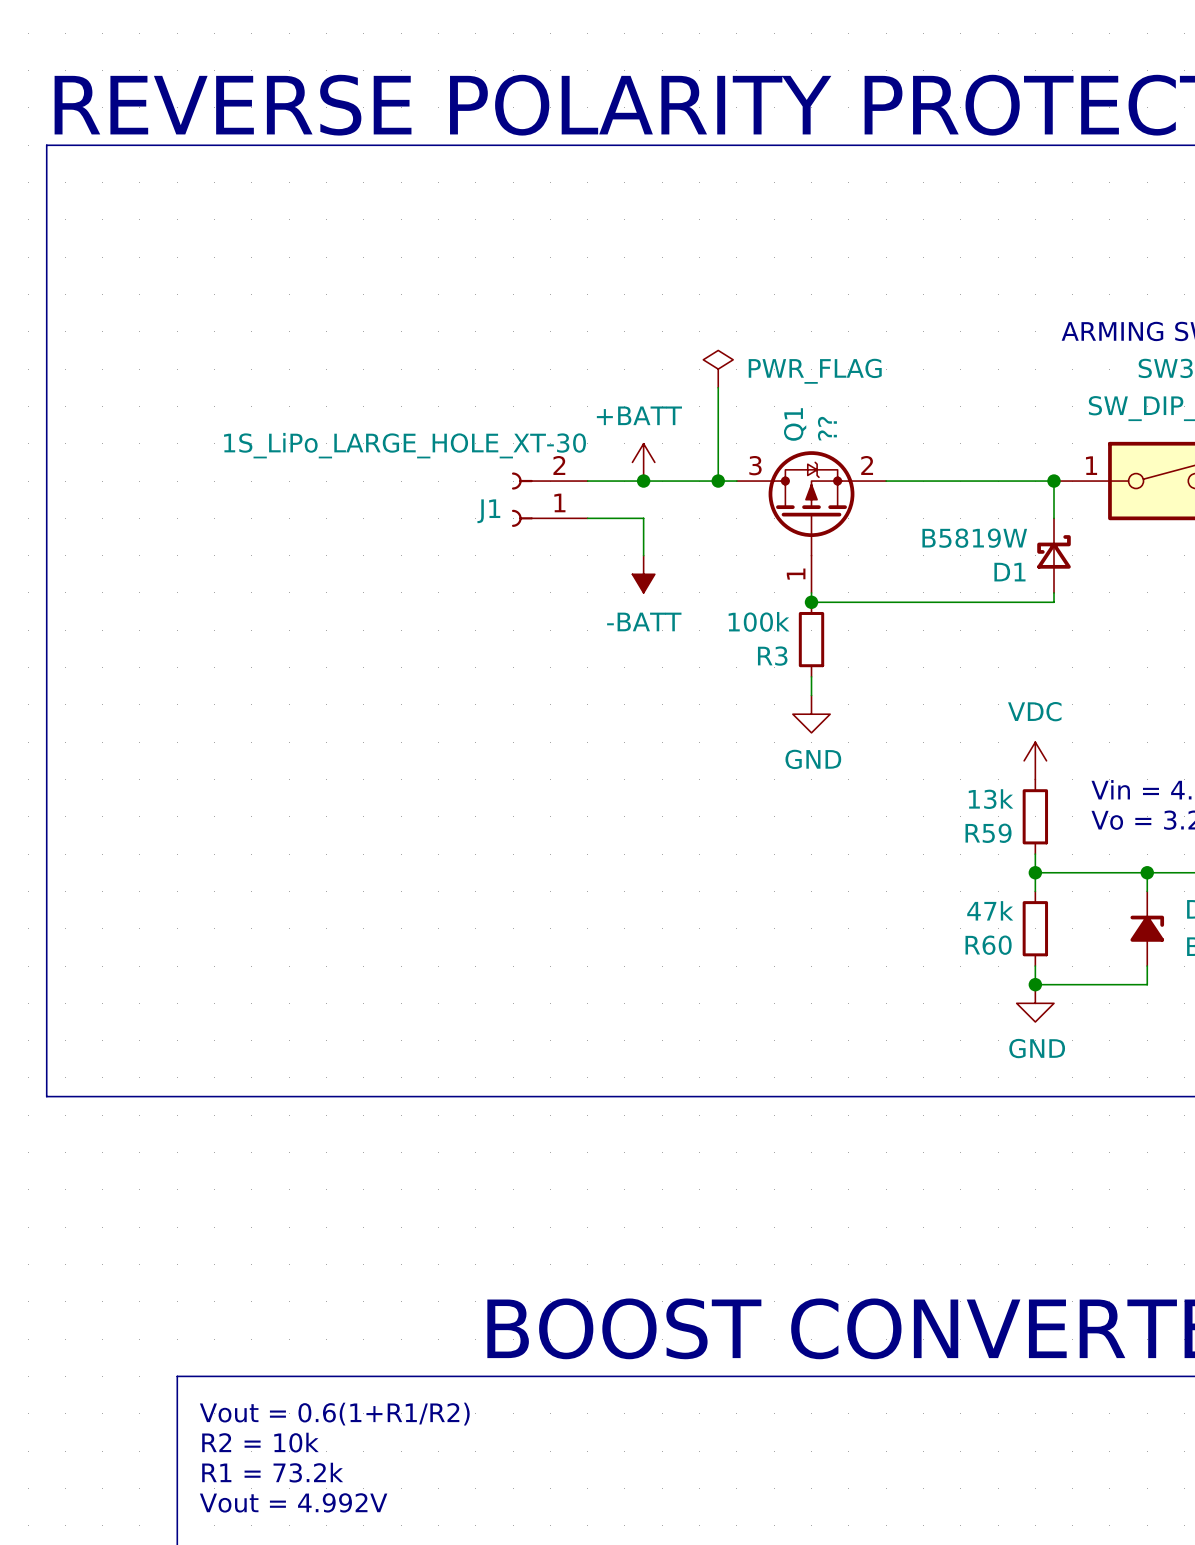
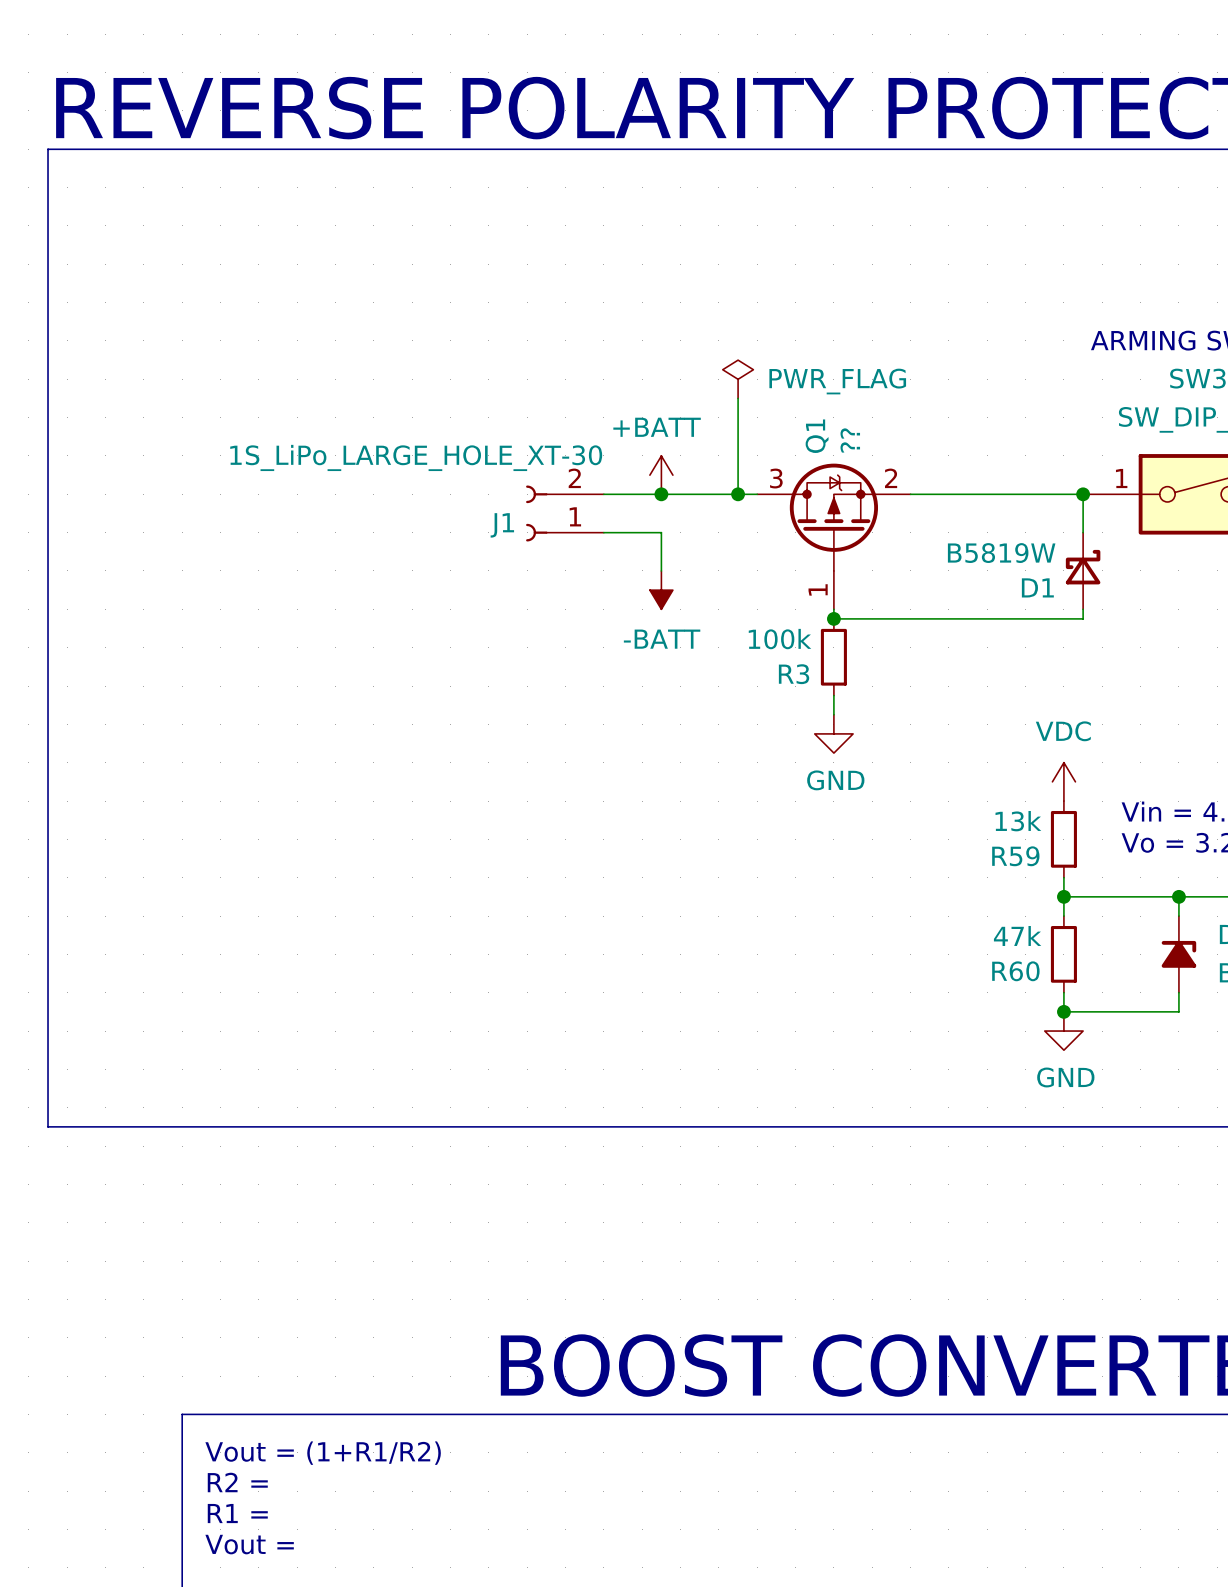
text: Vout = 0.6(1+R1/R2) (334, 1414) -> Vout = (1+R1/R2) (323, 1453)
text: R2 = 10k (260, 1442) -> R2 = (237, 1482)
text: R1 = 73.2k (272, 1472) -> R1 = (237, 1513)
text: Vout = 4.992V (293, 1502) -> Vout = (249, 1544)

